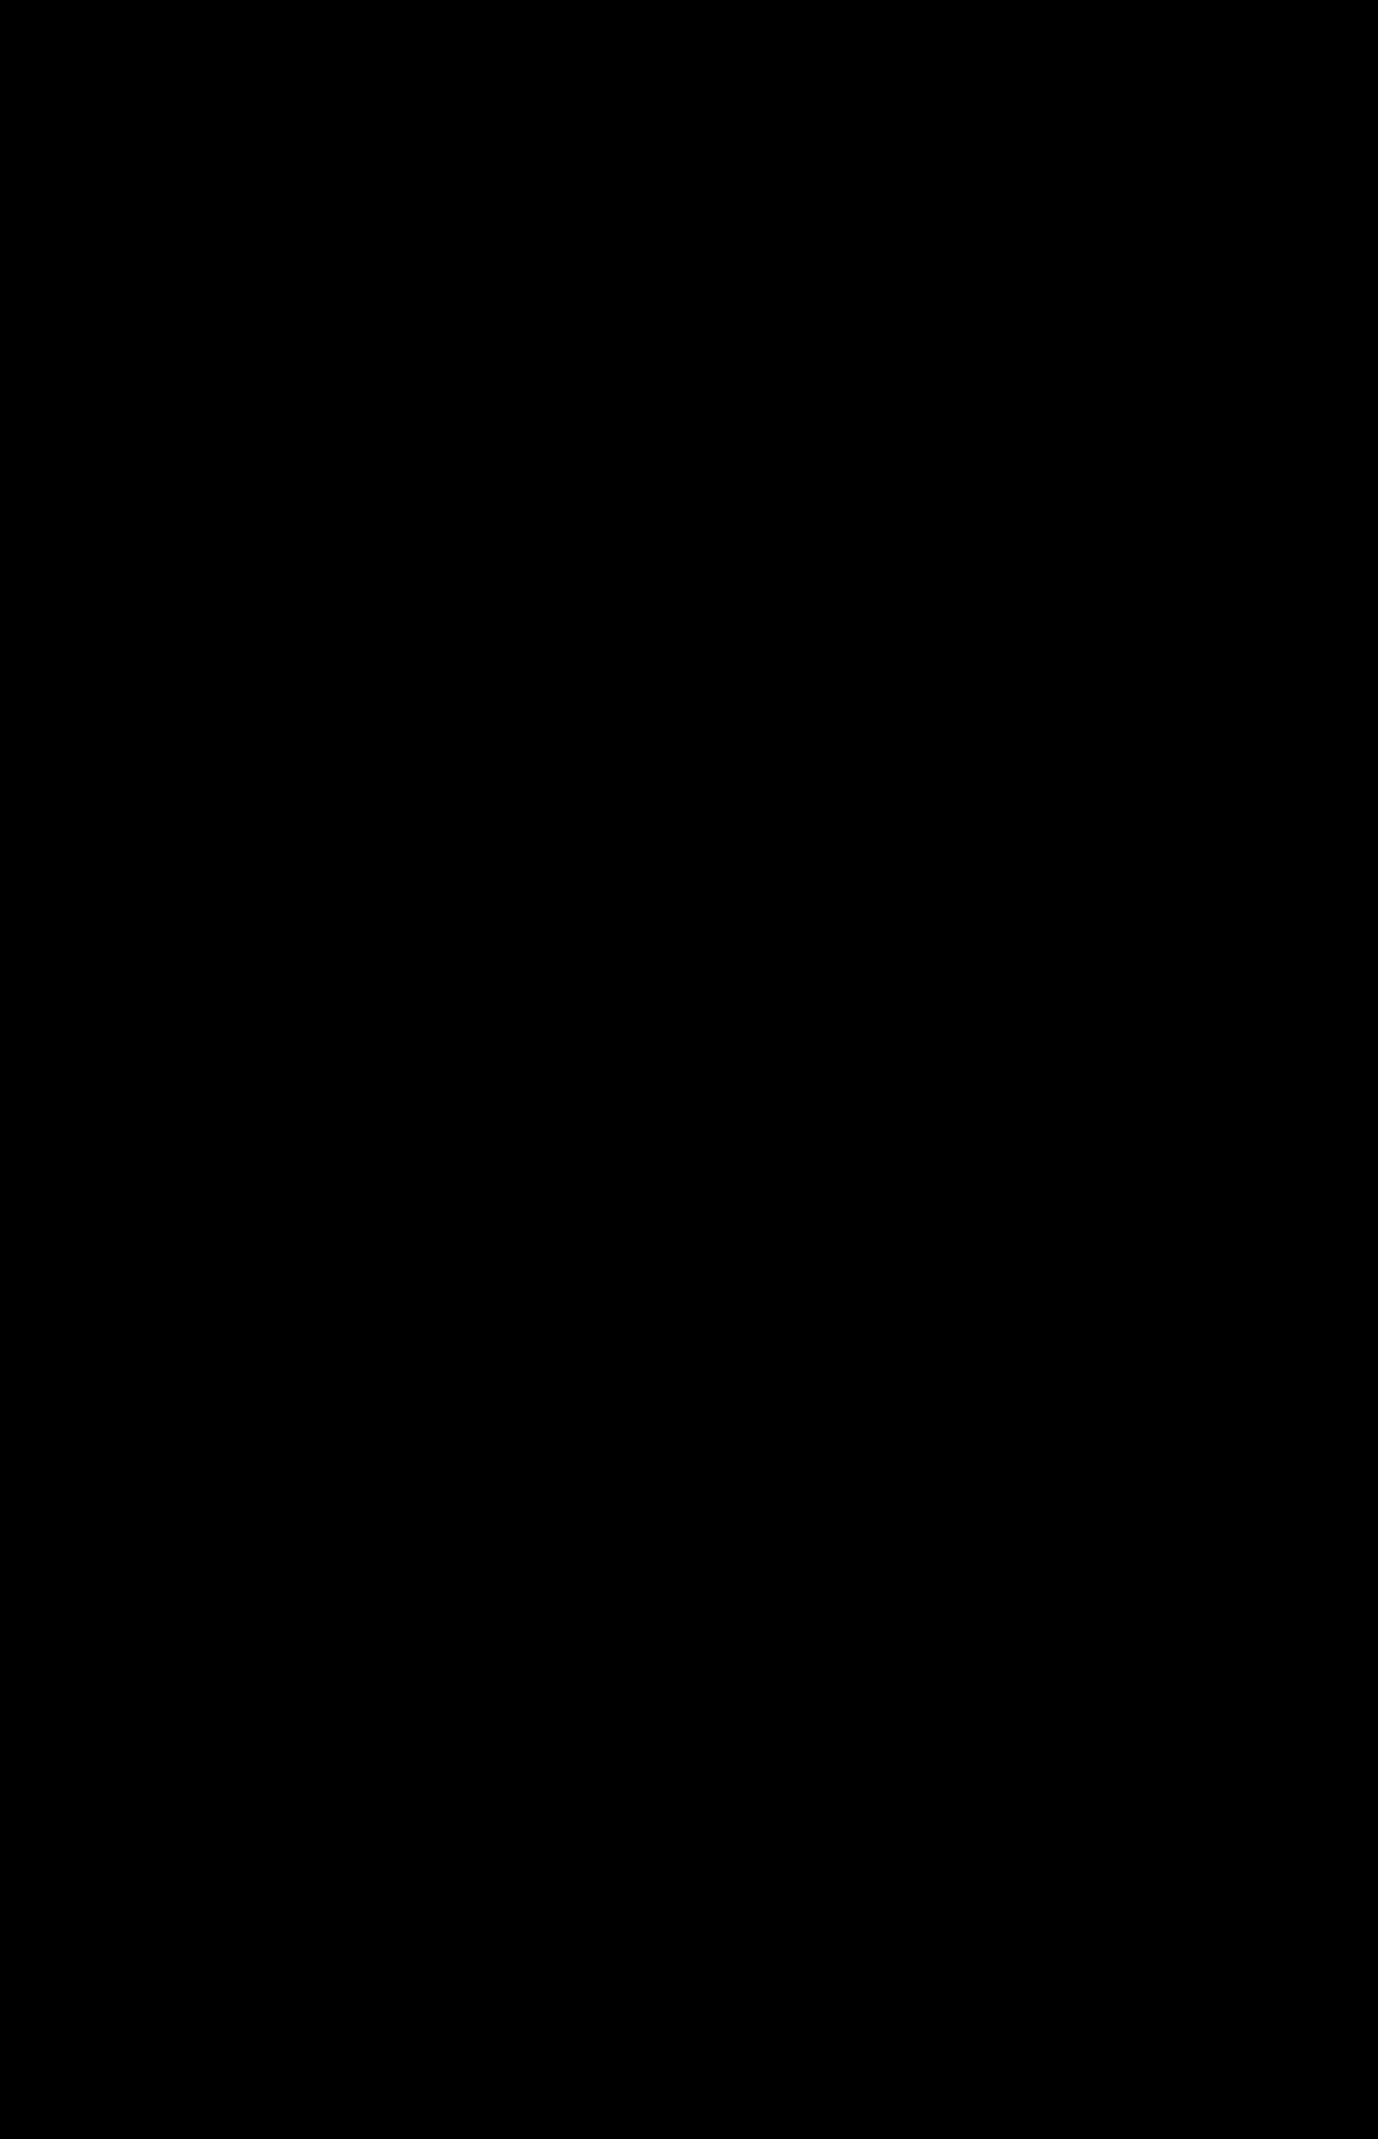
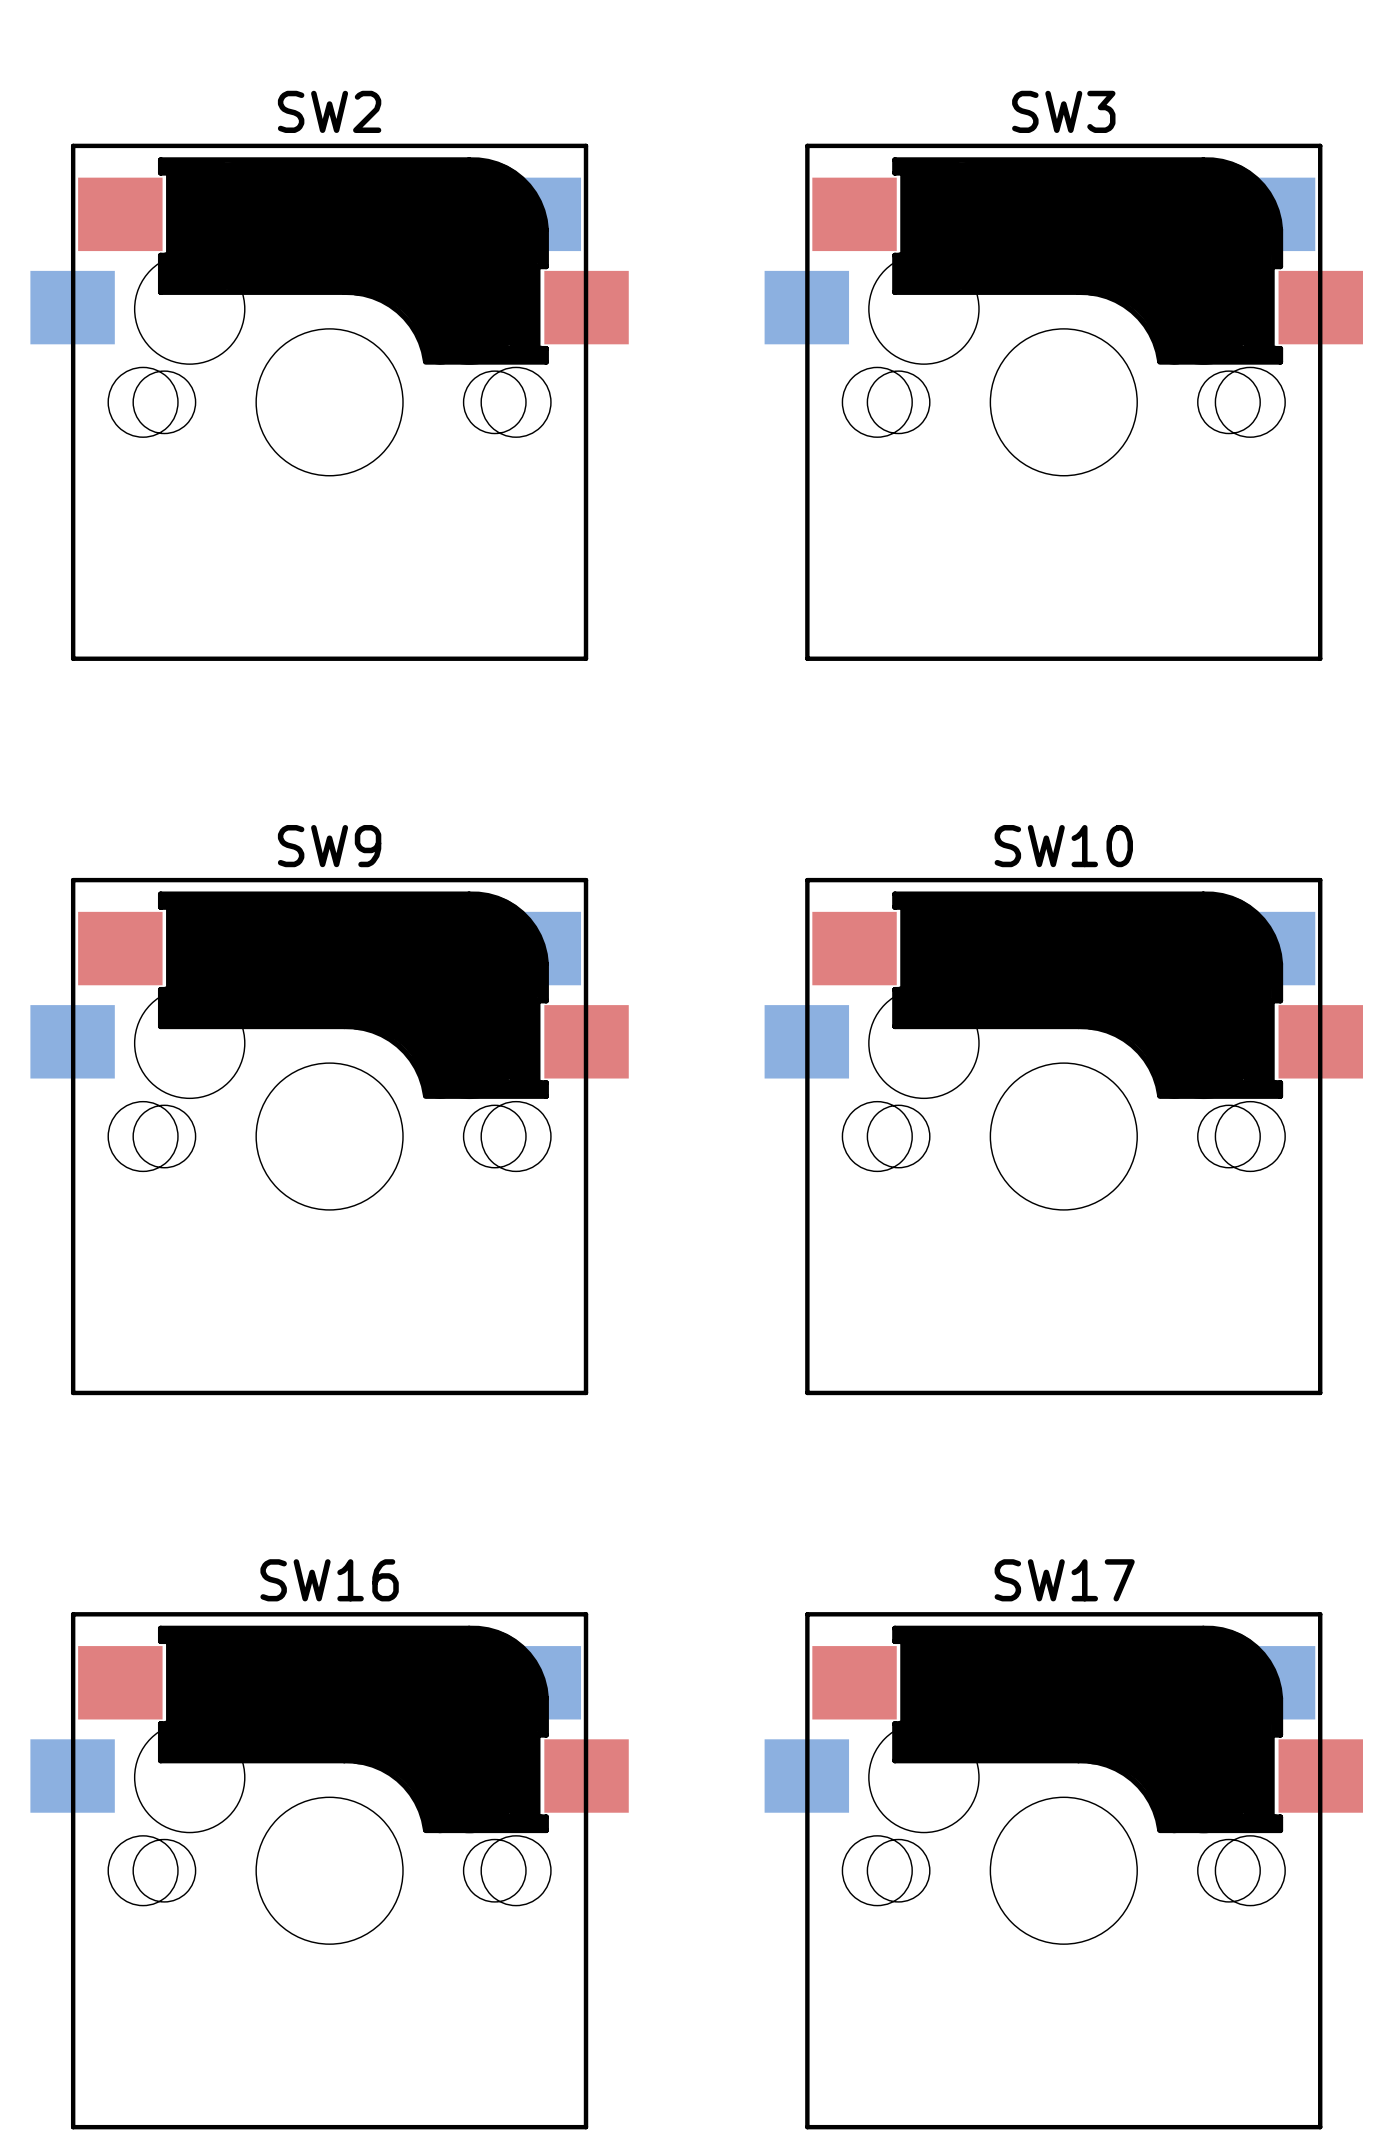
SW2: none -> (329, 402)
SW3: none -> (1063, 402)
SW9: none -> (329, 1136)
SW10: none -> (1063, 1136)
SW16: none -> (329, 1870)
SW17: none -> (1063, 1870)

